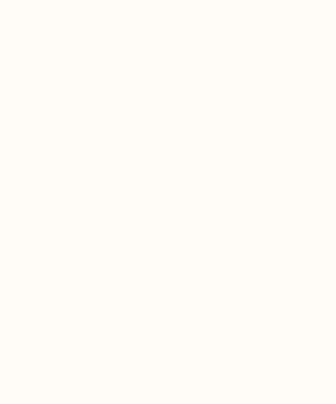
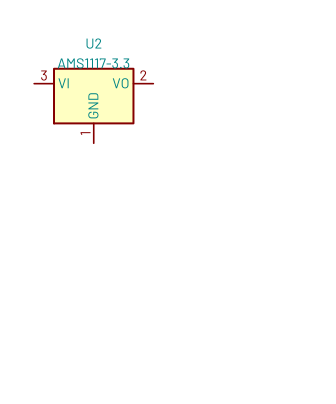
U2: none -> AMS1117-3.3 (93, 105)

